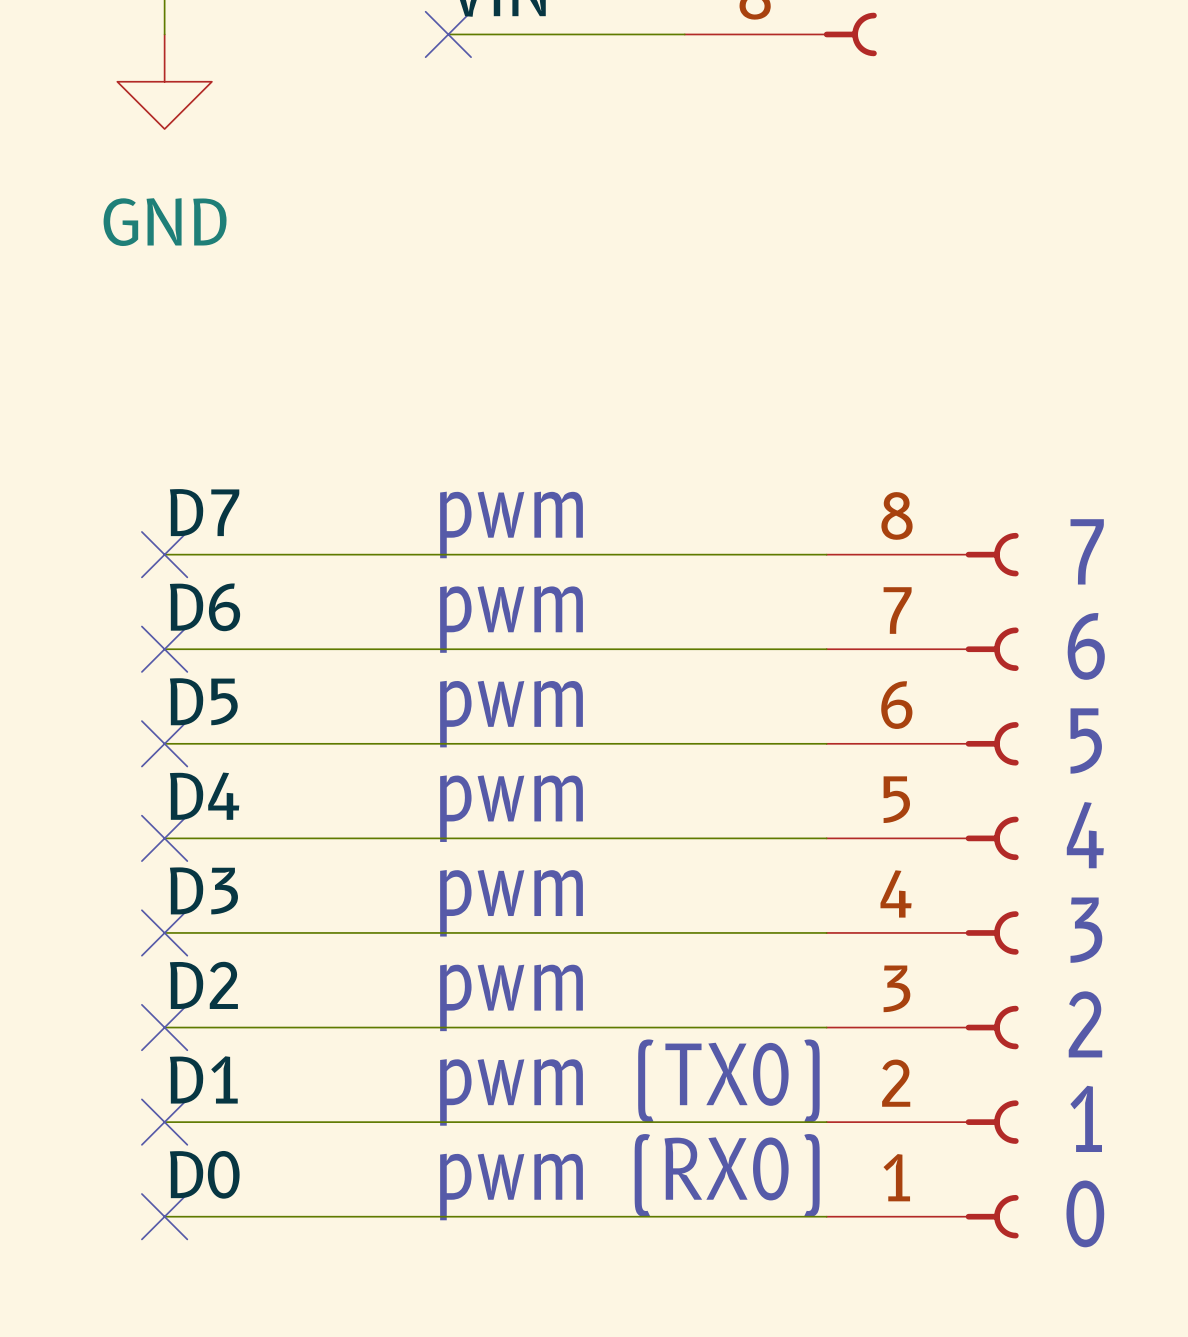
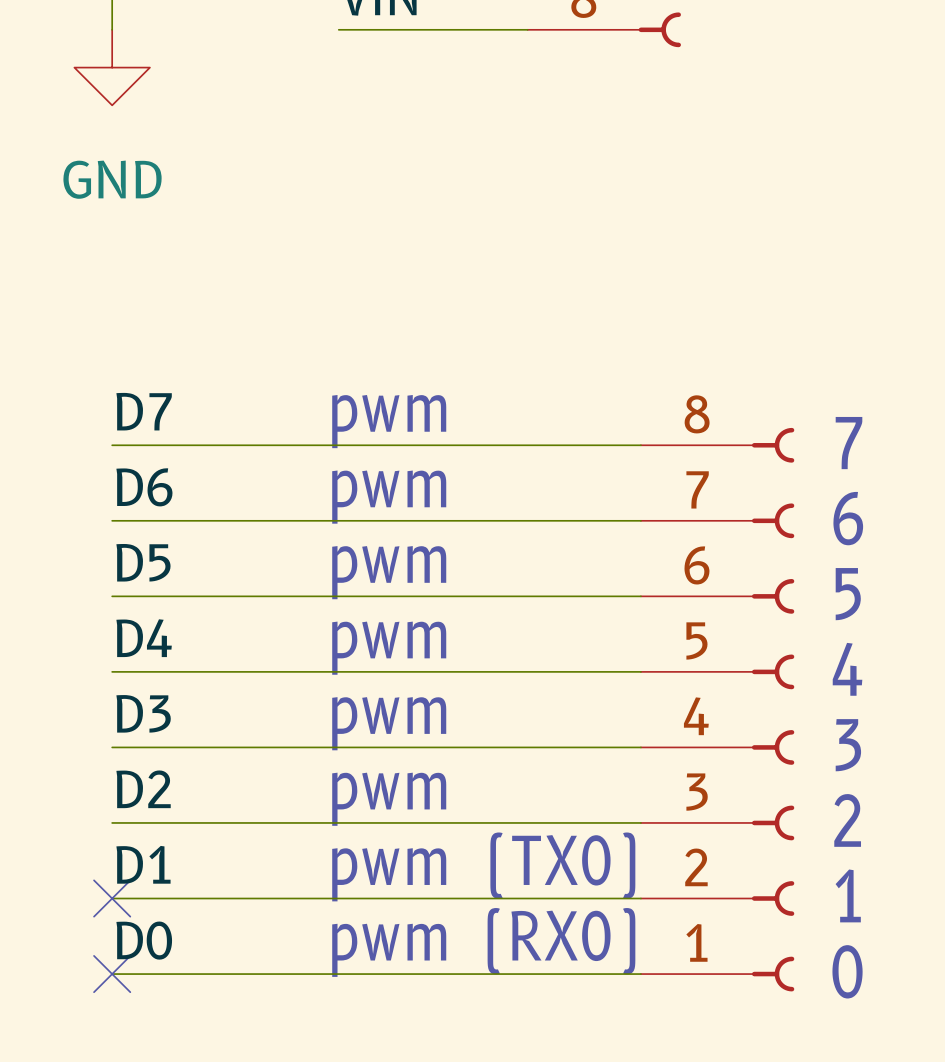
no-connect mark: (448, 34) -> none
no-connect mark: (164, 554) -> none
no-connect mark: (164, 649) -> none
no-connect mark: (164, 743) -> none
no-connect mark: (164, 838) -> none
no-connect mark: (164, 932) -> none
no-connect mark: (164, 1027) -> none

